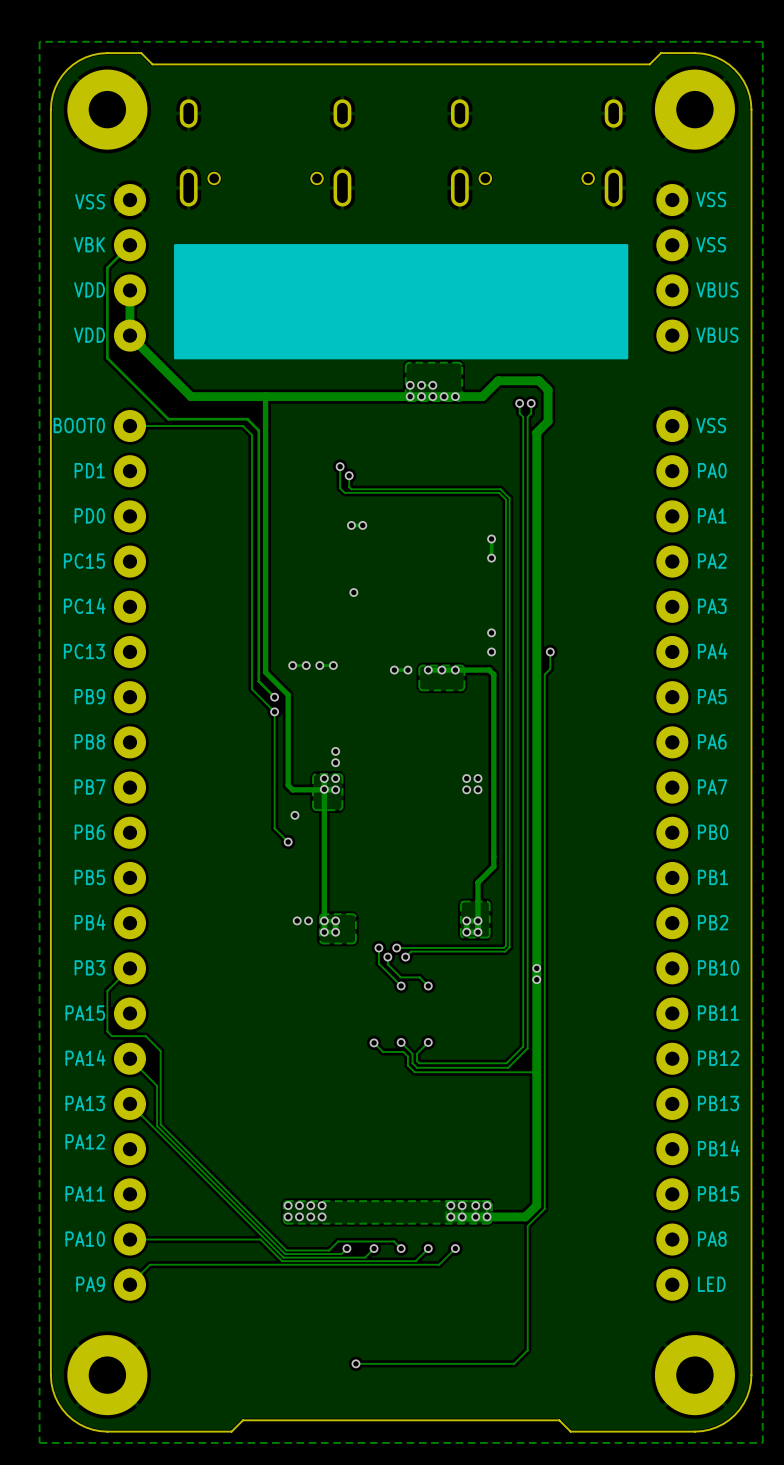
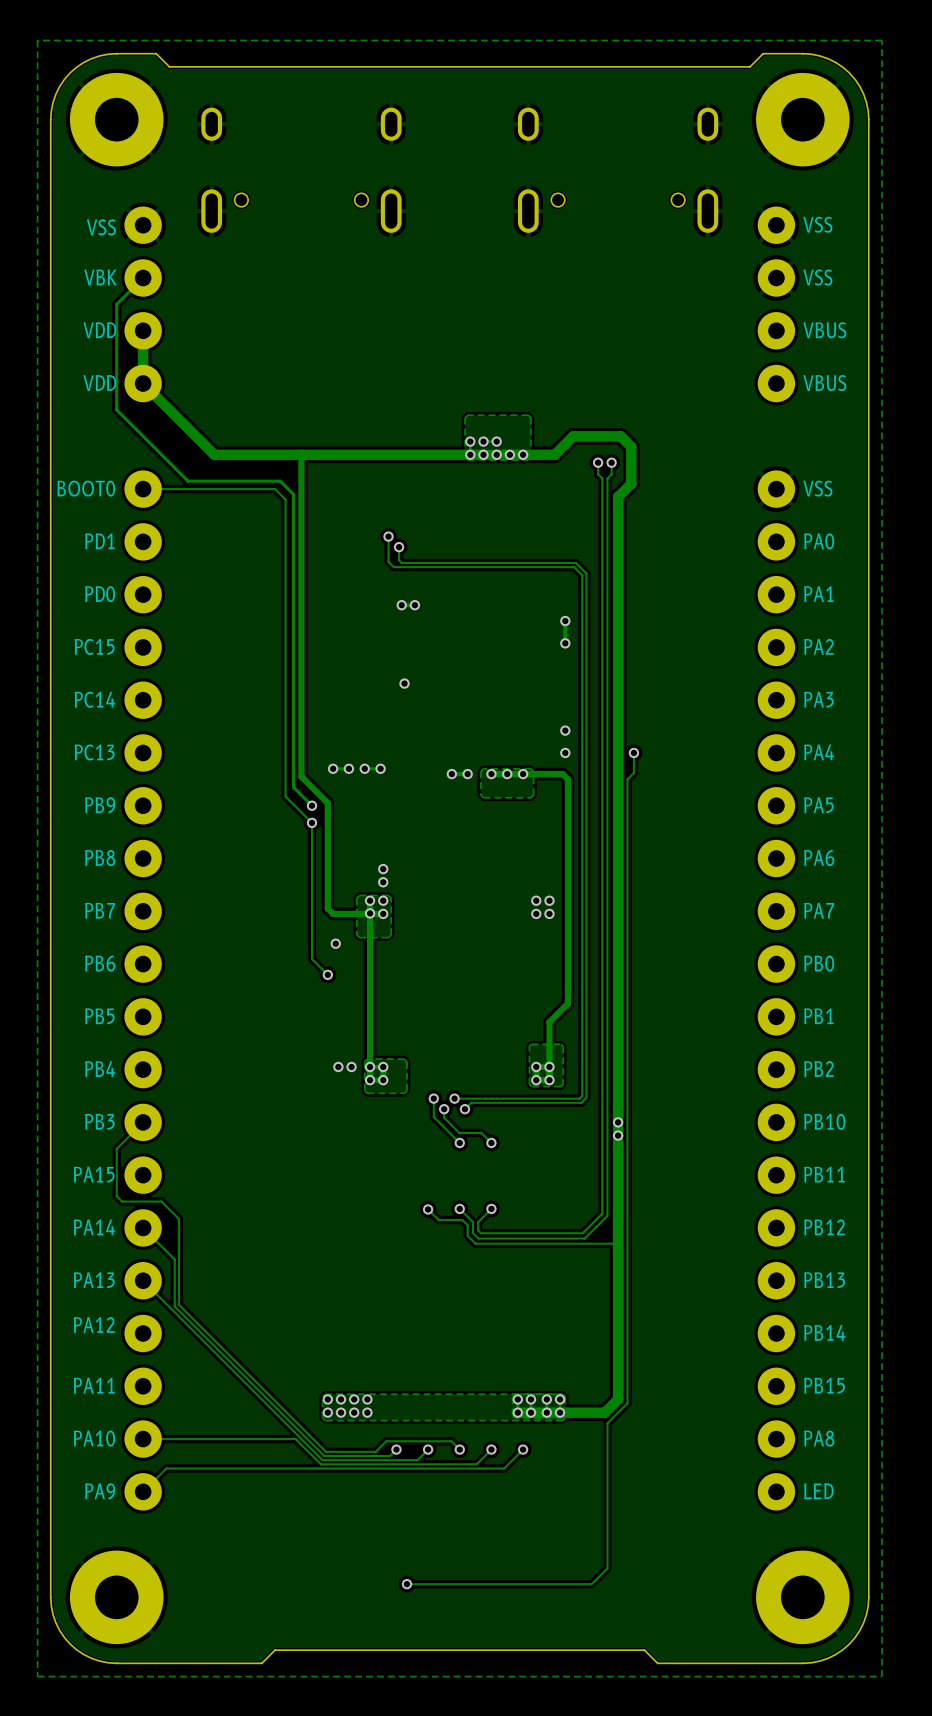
drawing: [174, 244, 629, 360] -> none

